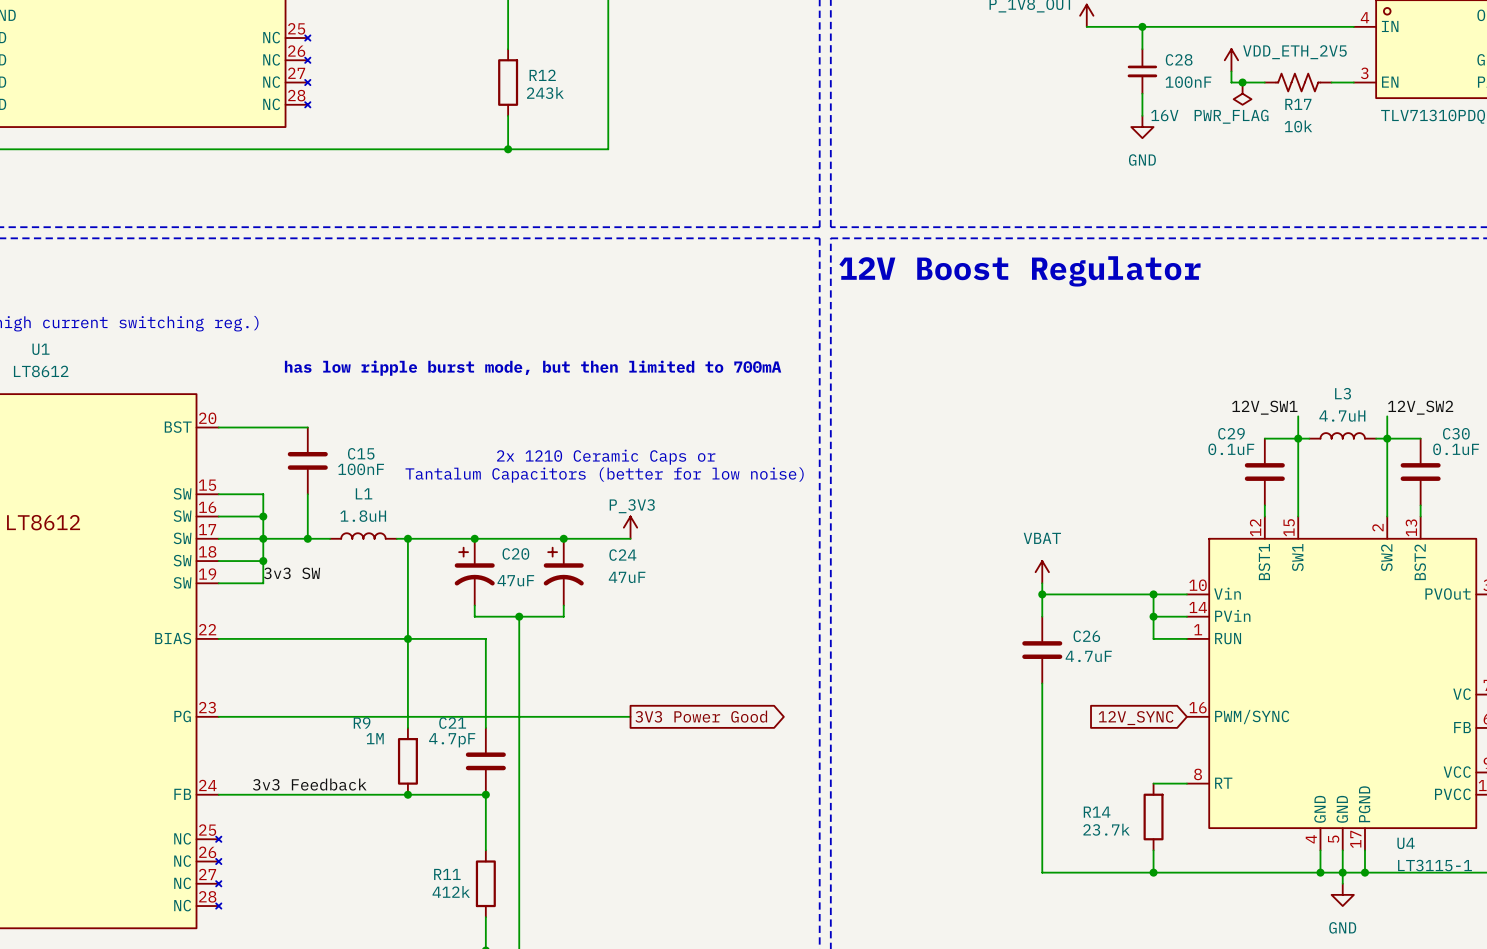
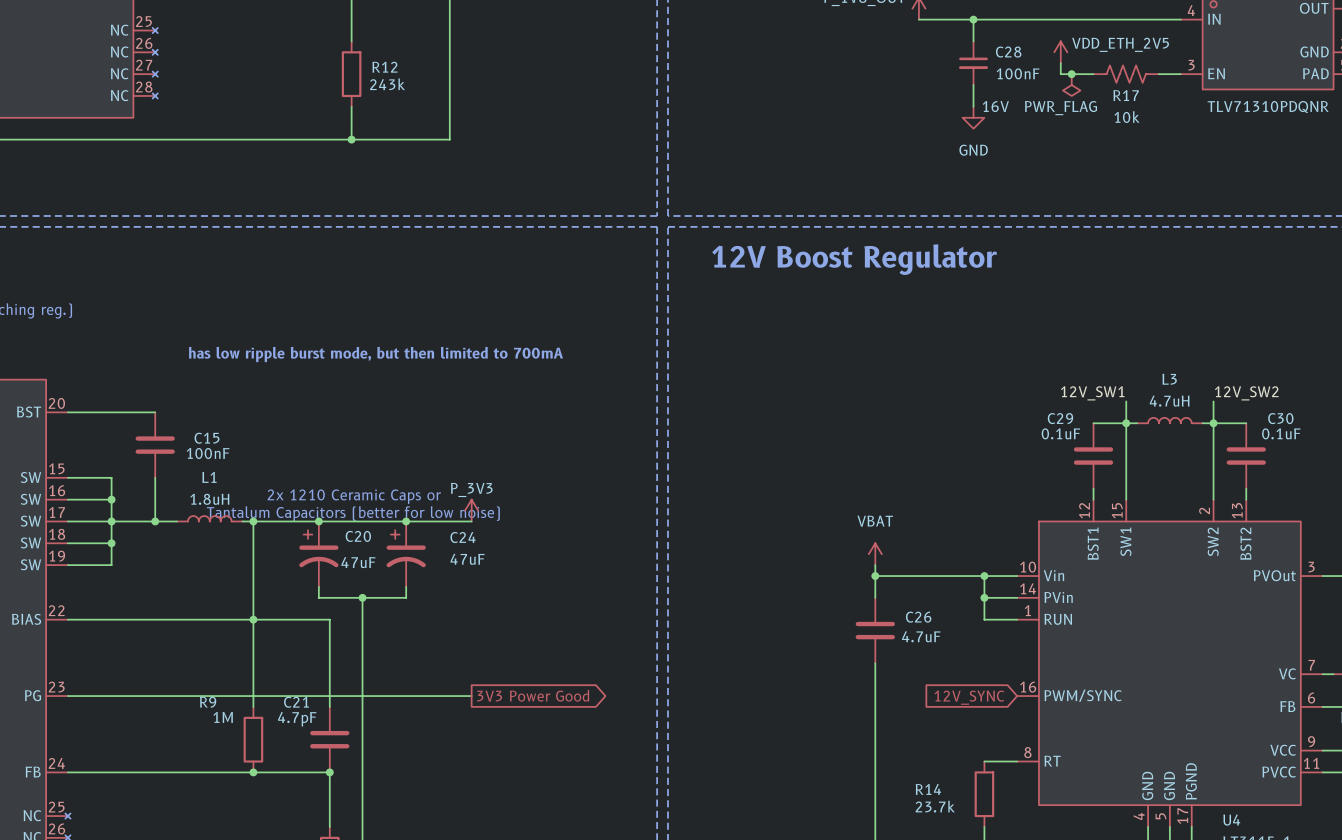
text position: 2x 1210 Ceramic Caps or (606, 457) -> 2x 1210 Ceramic Caps or (354, 496)
text position: Tantalum Capacitors (better for low noise) (604, 475) -> Tantalum Capacitors (better for low noise) (353, 513)
label: 3v3 SW (292, 573) -> none
label: 3v3 Feedback (309, 784) -> none

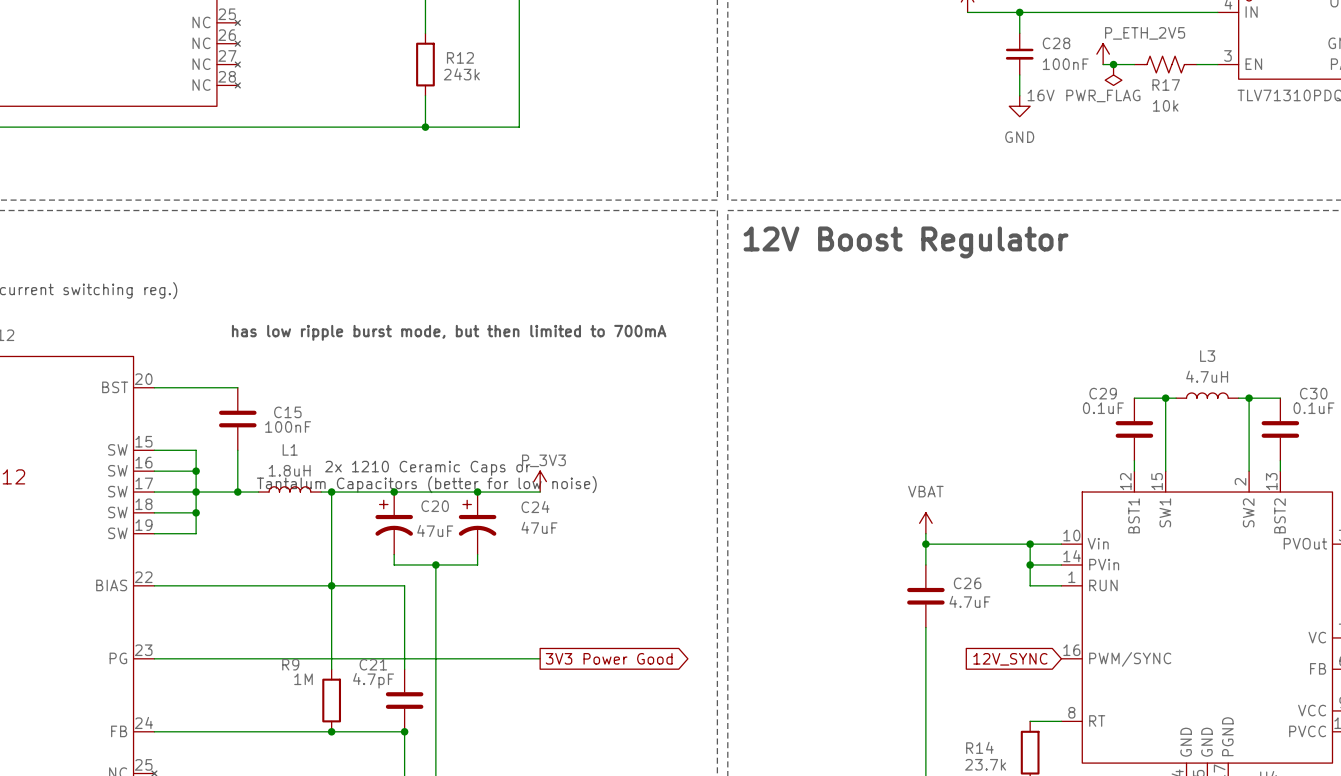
power symbol: VDD_ETH_2V5 (1060, 52) -> none
power symbol: none -> P_ETH_2V5 (1103, 54)
label: 12V_SW1 (1092, 393) -> none
label: 12V_SW2 (1246, 393) -> none
wire: (1126, 401) (1126, 423) -> none
wire: (1213, 401) (1213, 423) -> none

